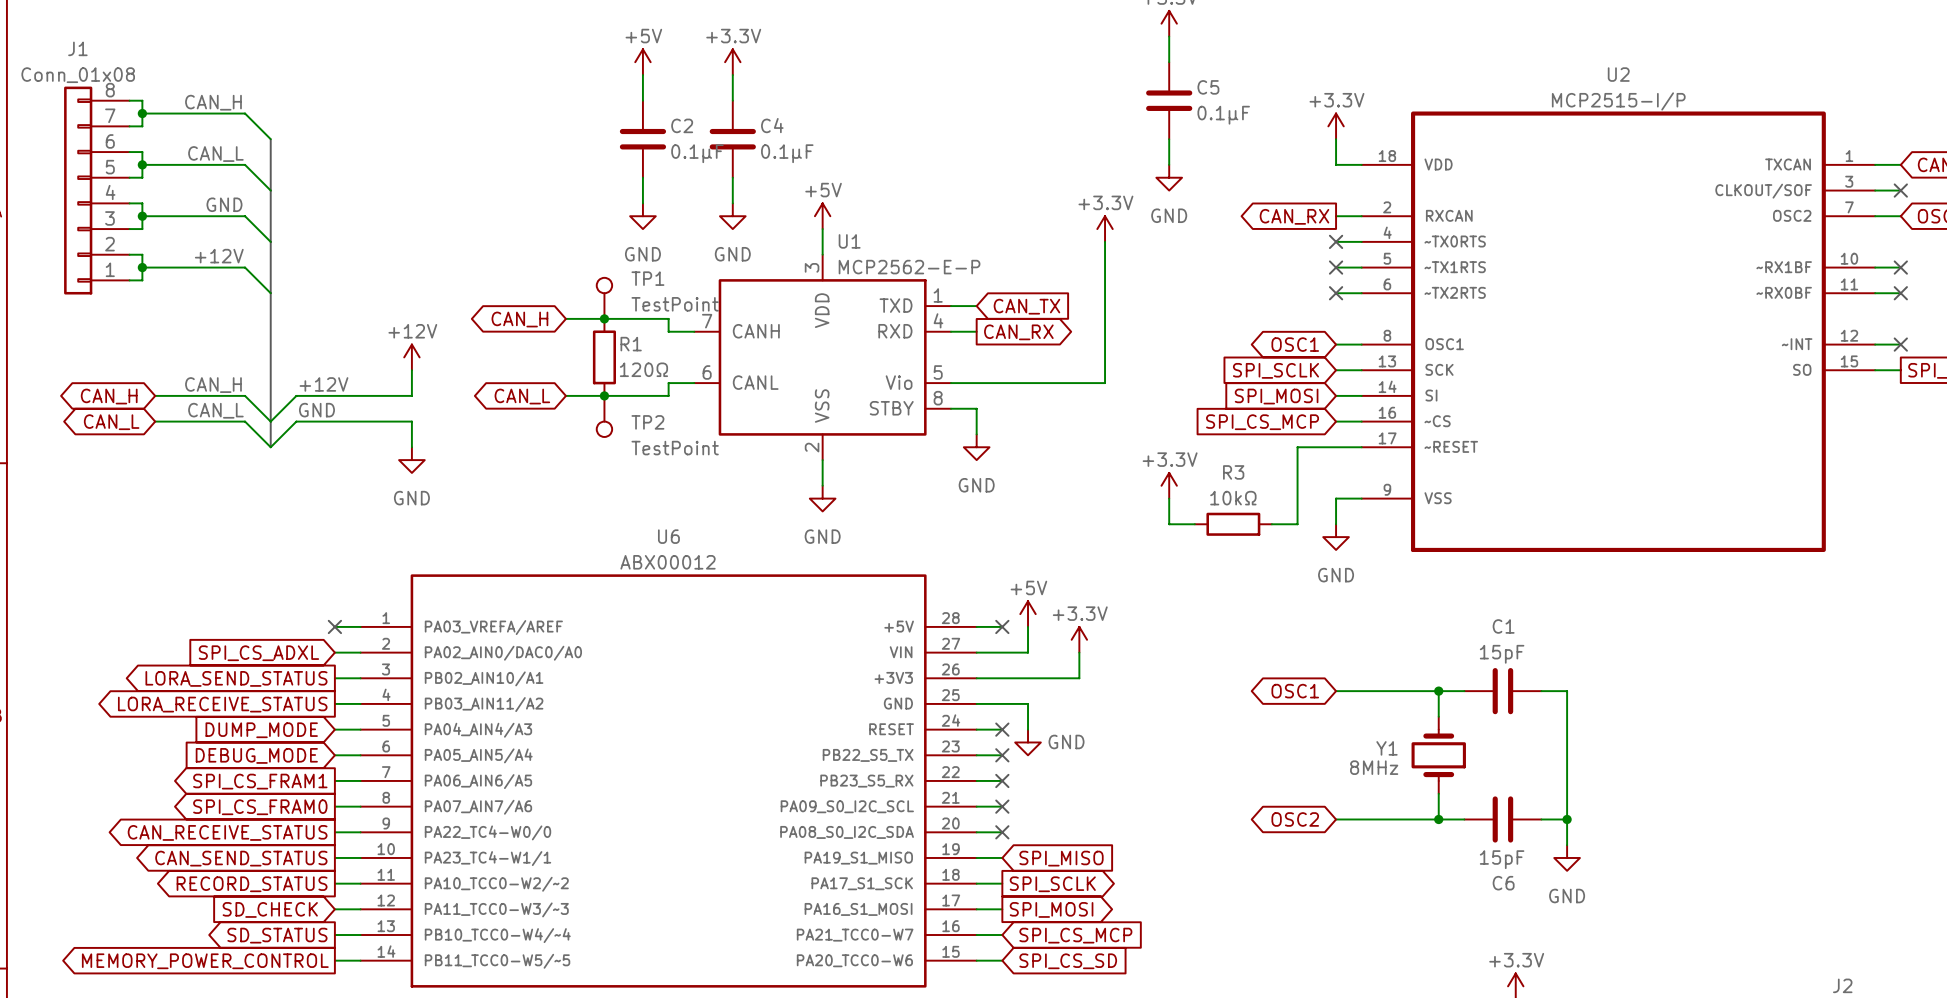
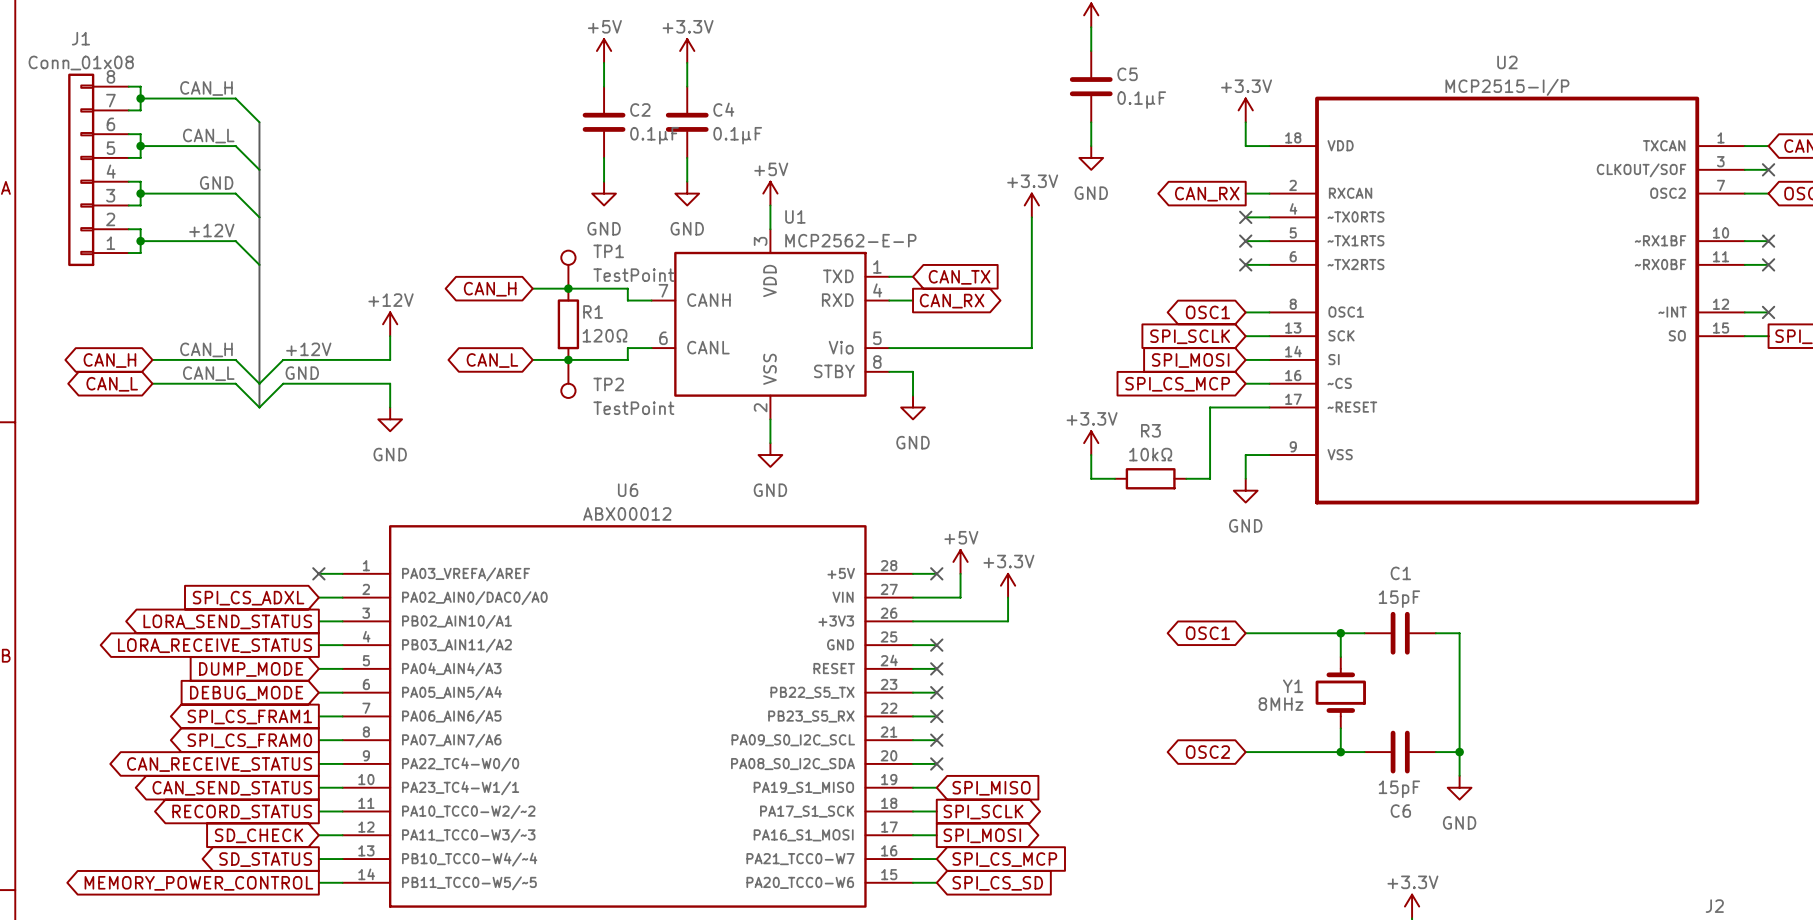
wire: (1002, 703) (1028, 703) (1028, 729) -> none
no-connect mark: none -> (936, 645)
power symbol: GND (1028, 742) -> none

